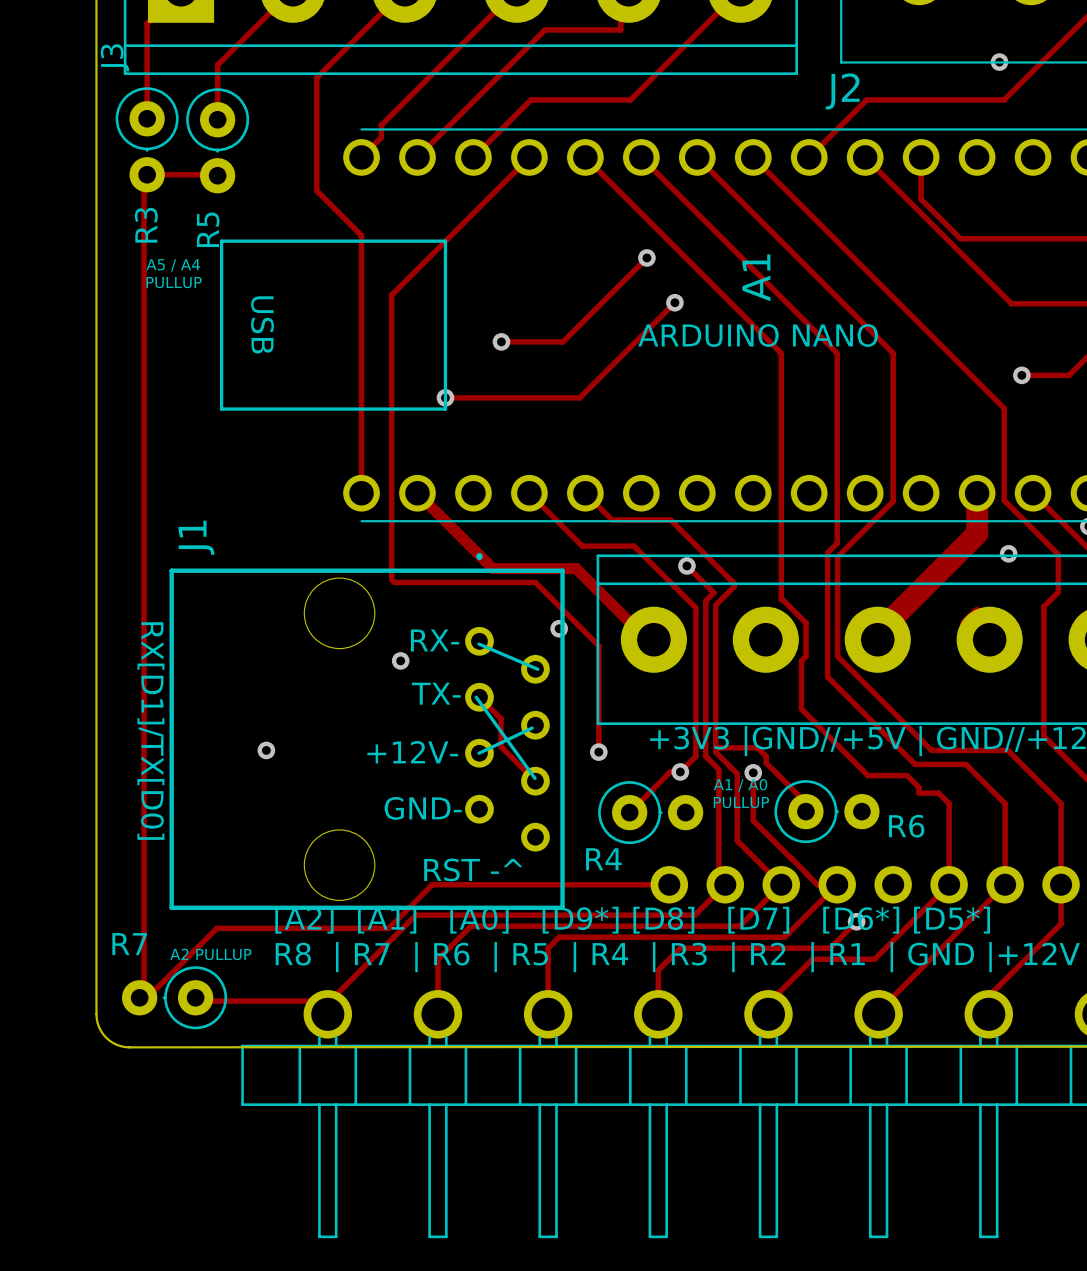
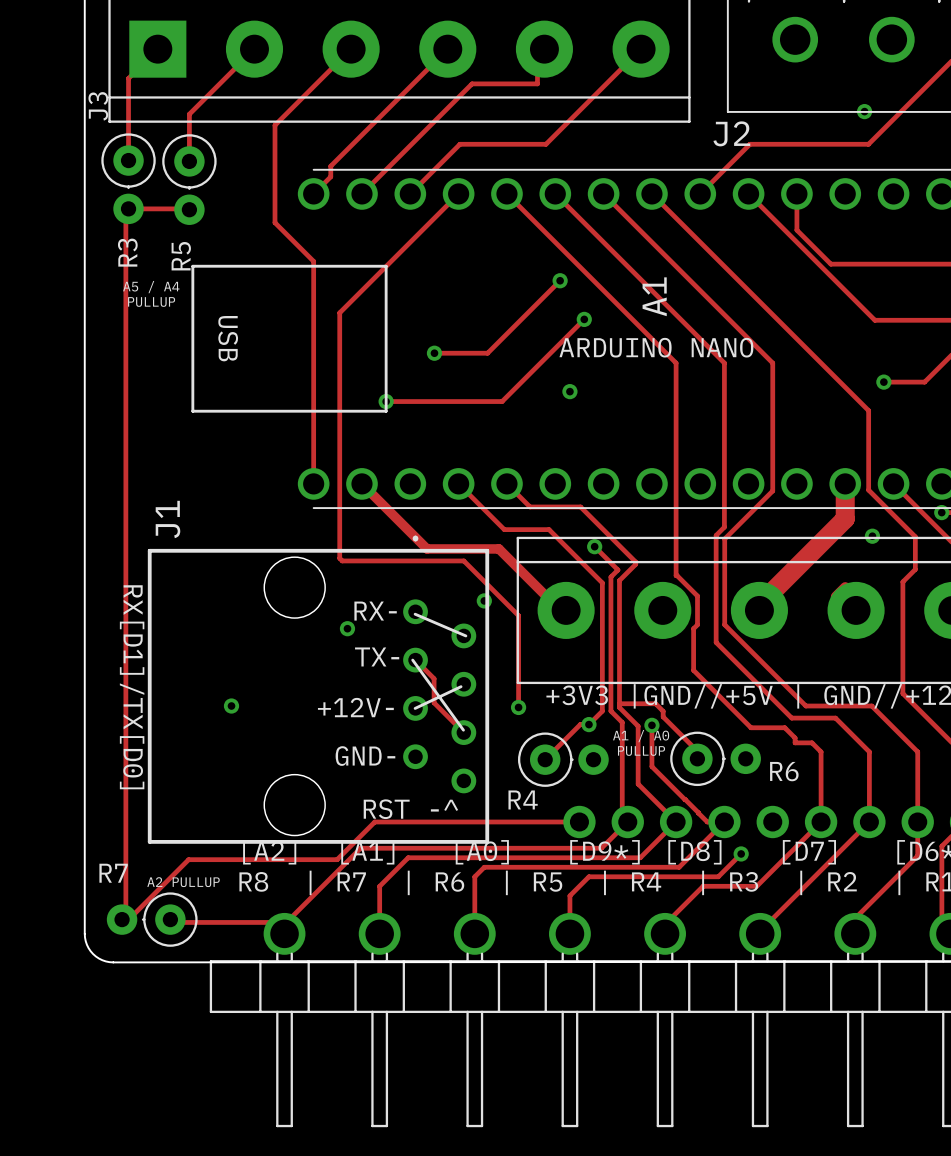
via: none -> (569, 391)

